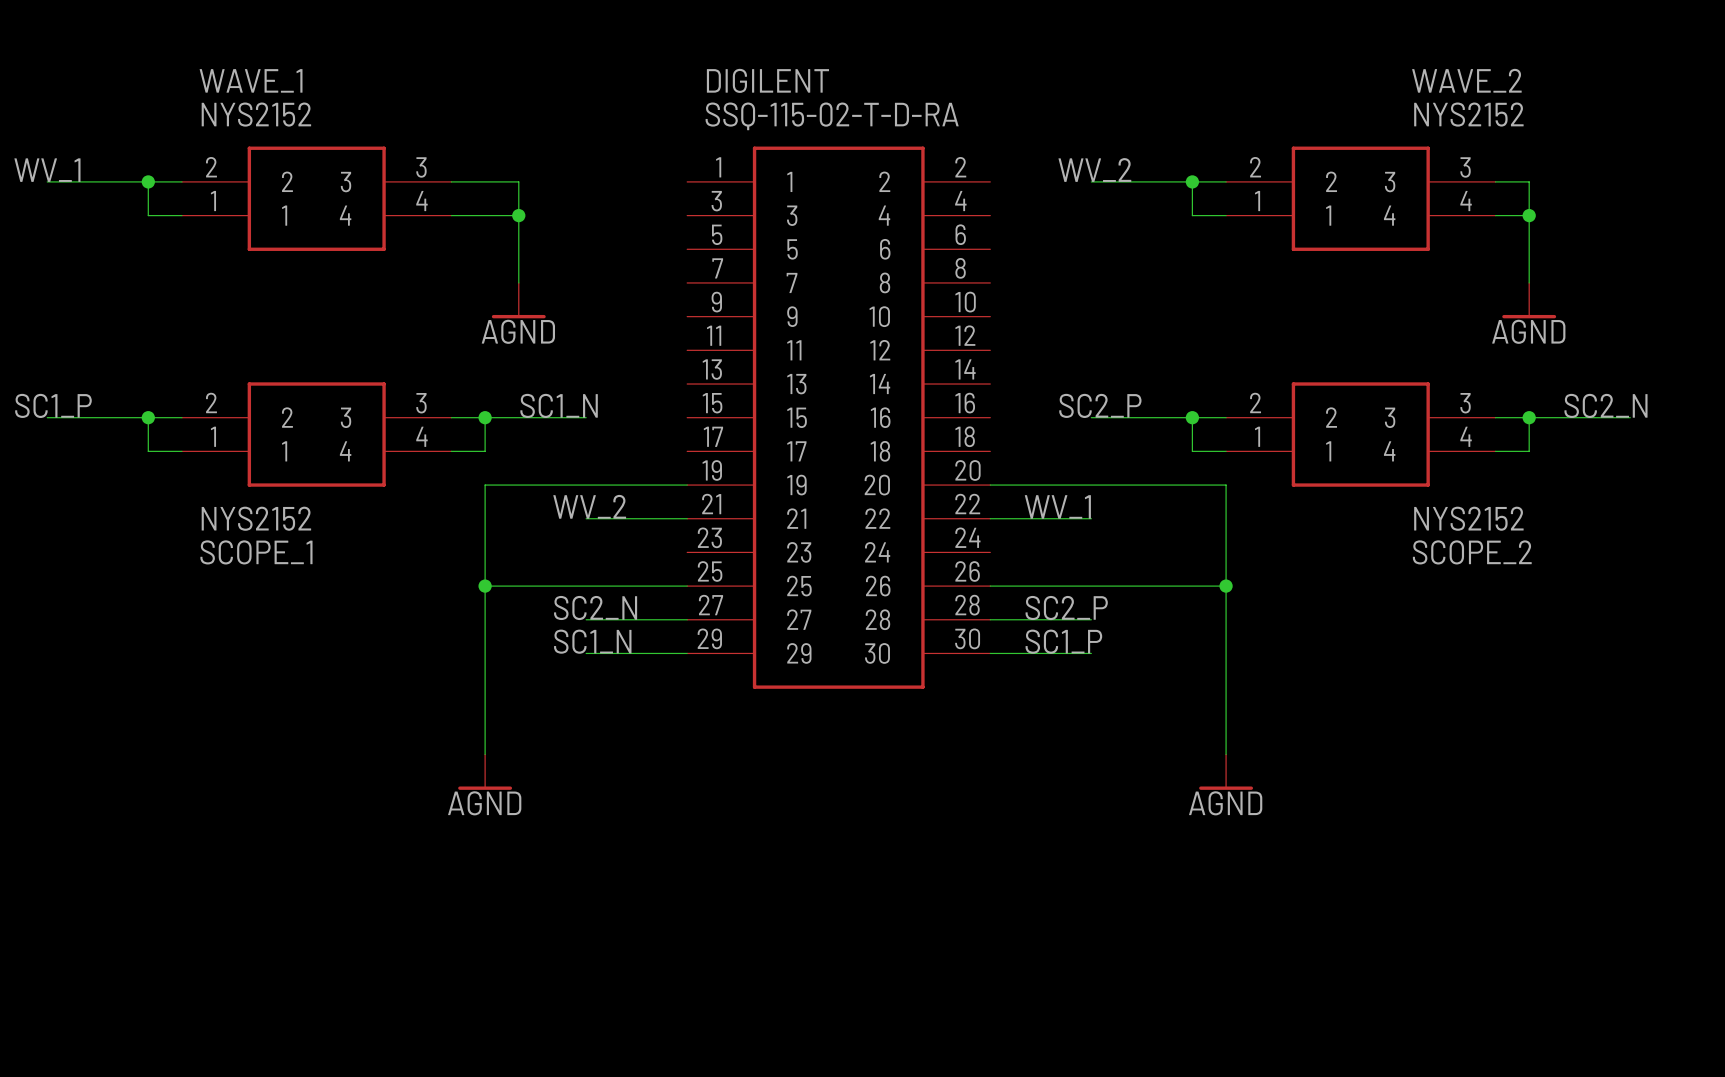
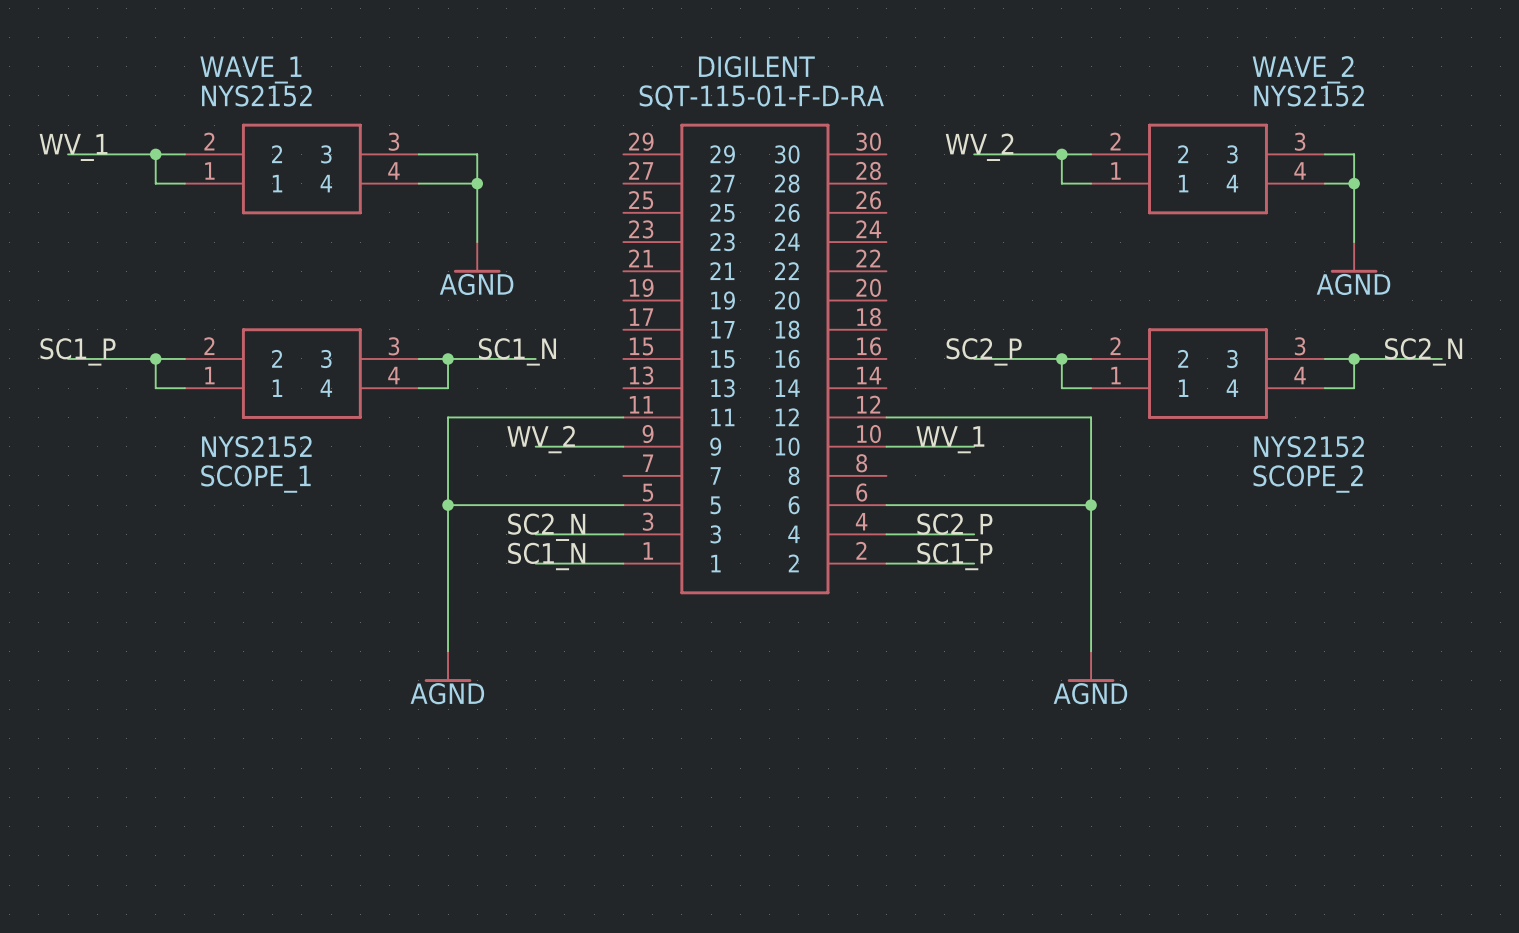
DIGILENT name position: DIGILENT (767, 80) -> DIGILENT (756, 66)
DIGILENT value: SSQ-115-02-T-D-RA (832, 116) -> SQT-115-01-F-D-RA (761, 97)
DIGILENT flip: as is (838, 417) -> up-down (754, 358)

